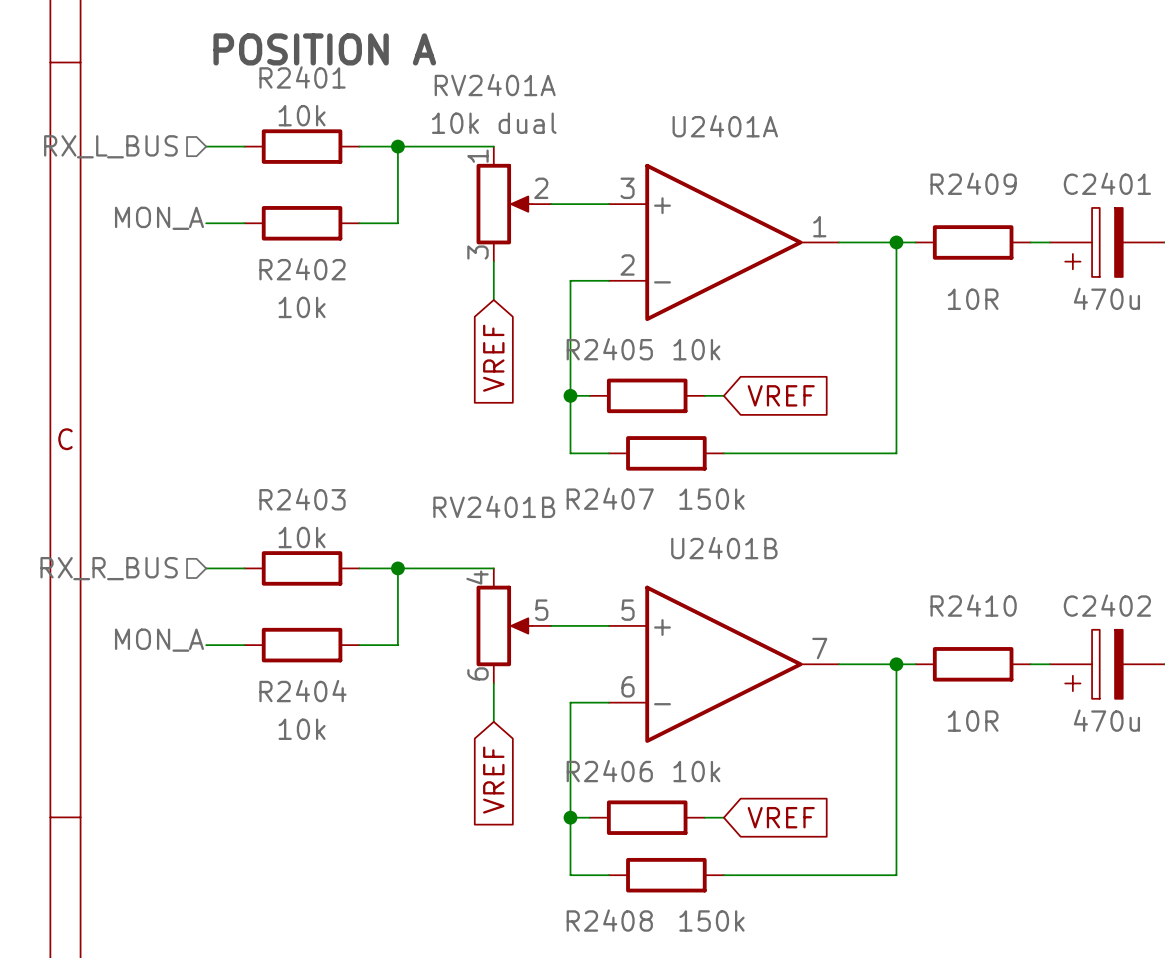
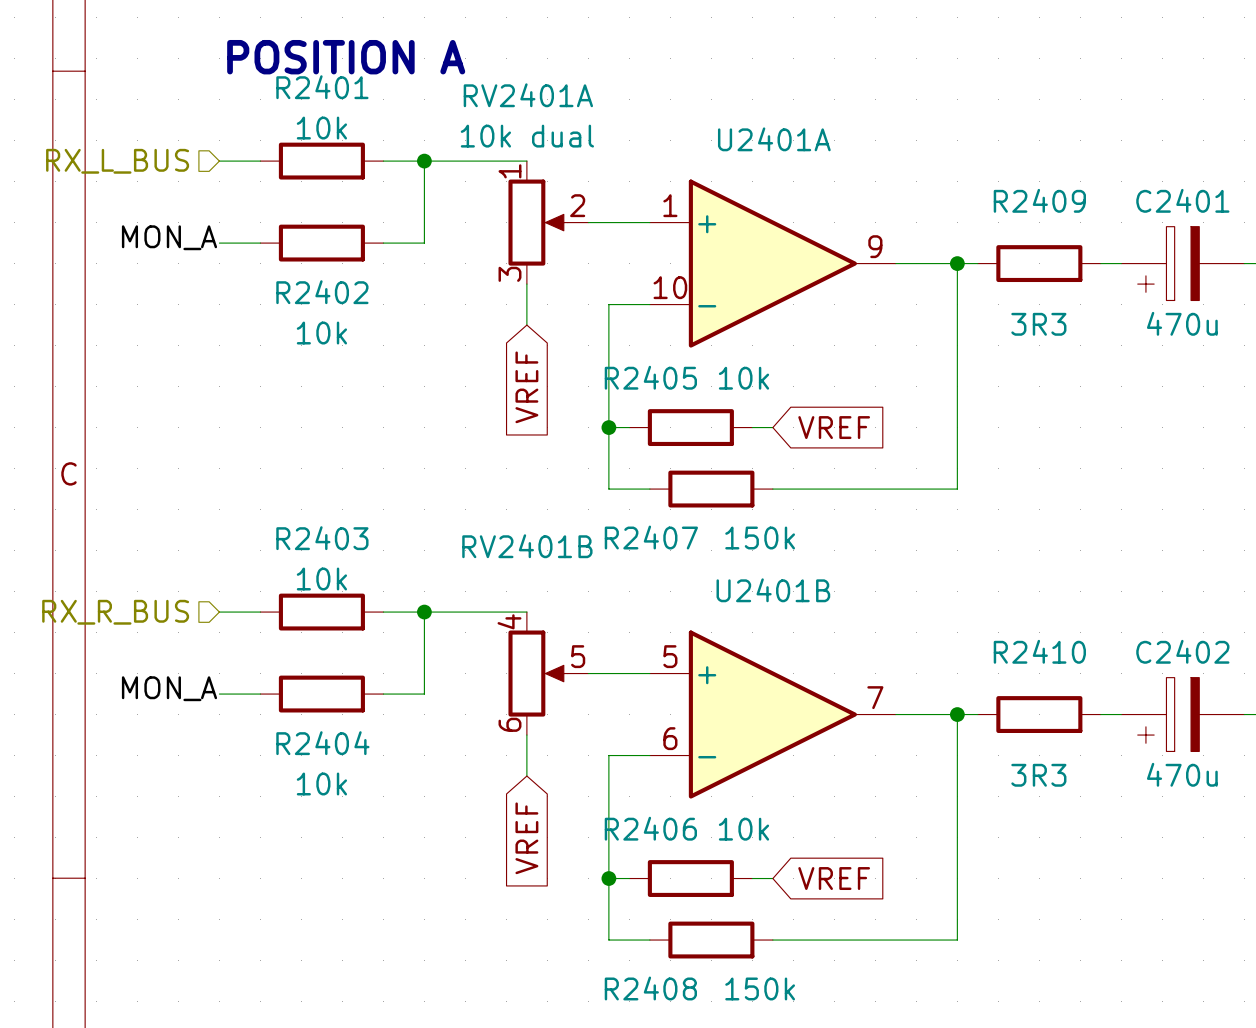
U2401A pin number: 3 (627, 188) -> 1 (670, 205)
U2401A pin number: 1 (819, 226) -> 9 (875, 246)
U2401A pin number: 2 (627, 264) -> 10 (670, 287)
R2409 value: 10R (973, 299) -> 3R3 (1038, 324)
R2410 value: 10R (973, 721) -> 3R3 (1038, 775)

